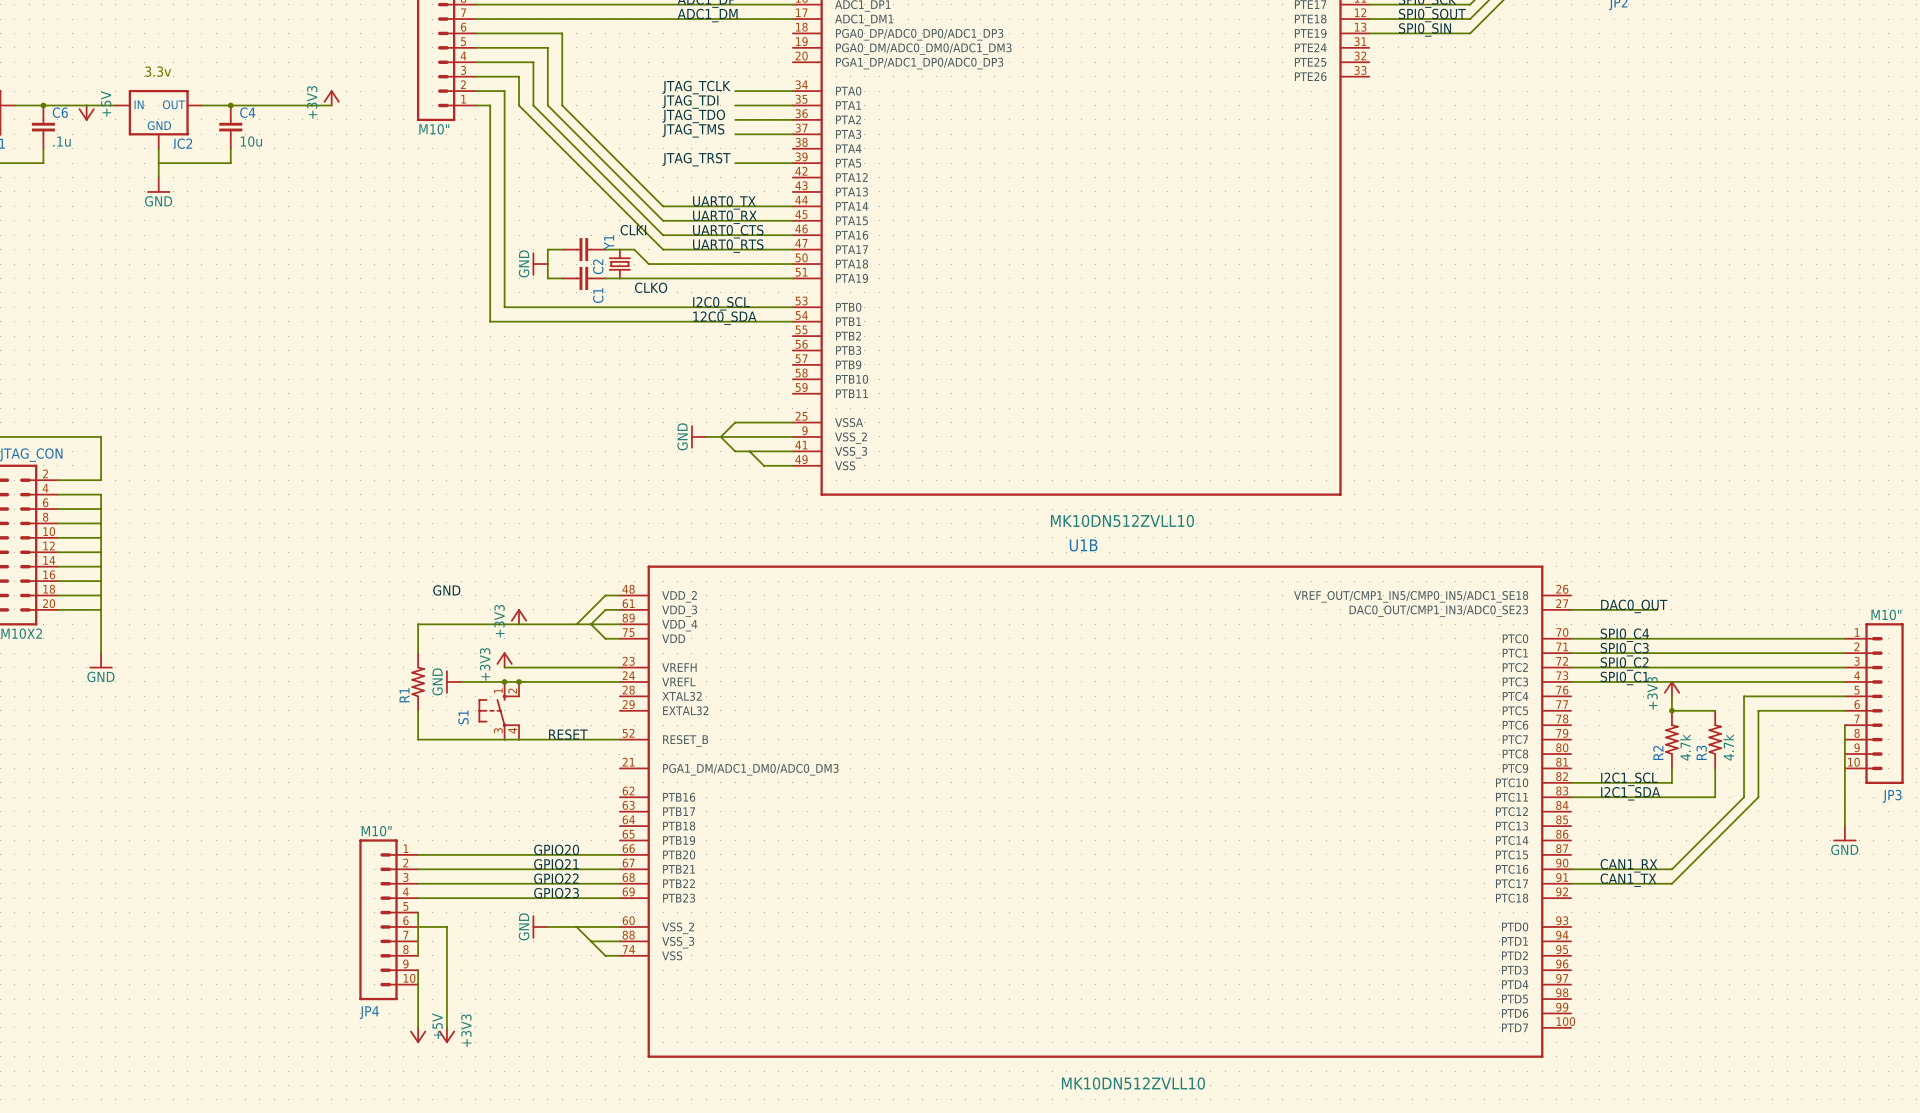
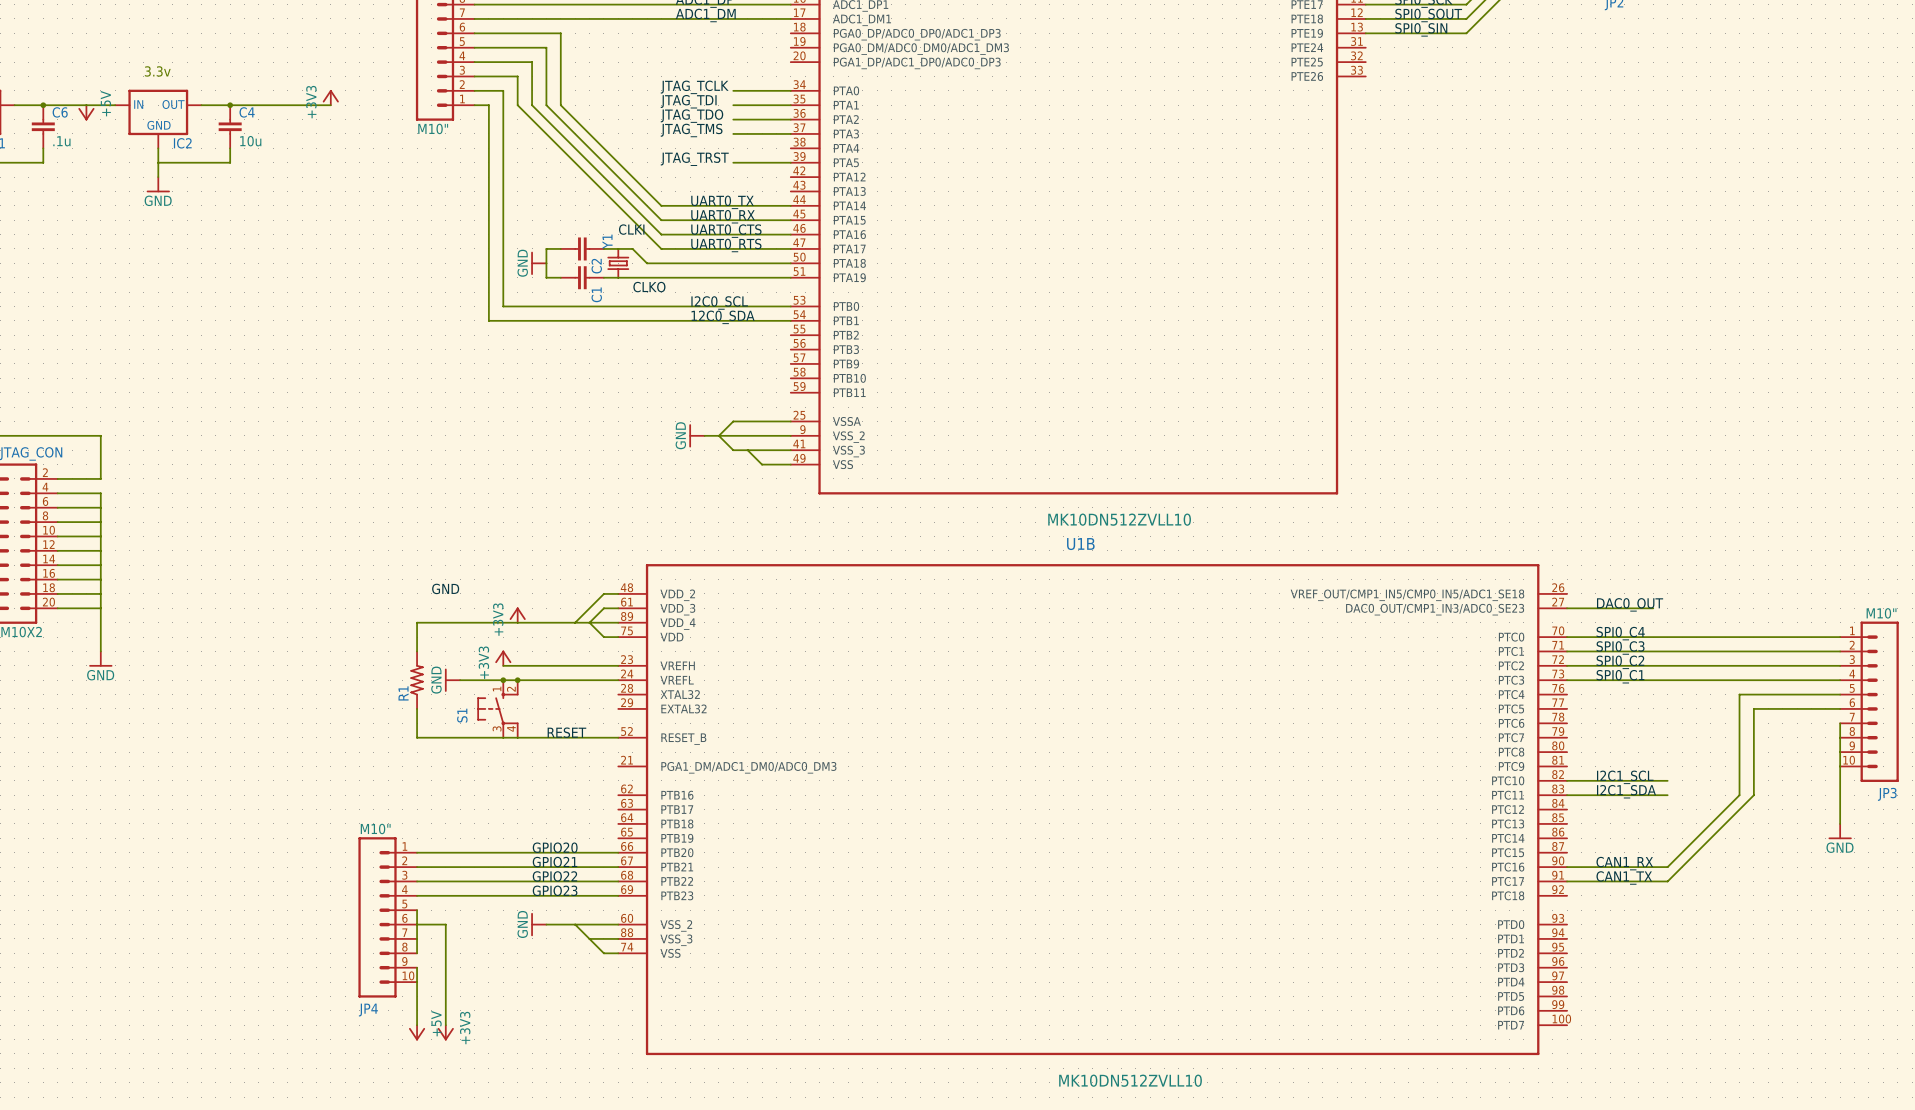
power symbol: +3V3 (1671, 688) -> none
wire: (1671, 696) (1671, 710) (1715, 710) -> none
junction: (1671, 710) -> none
R2: 4.7k (1671, 739) -> none
R3: 4.7k (1715, 739) -> none
wire: (1671, 768) (1671, 782) -> none
wire: (1715, 768) (1715, 797) (1671, 797) -> none

